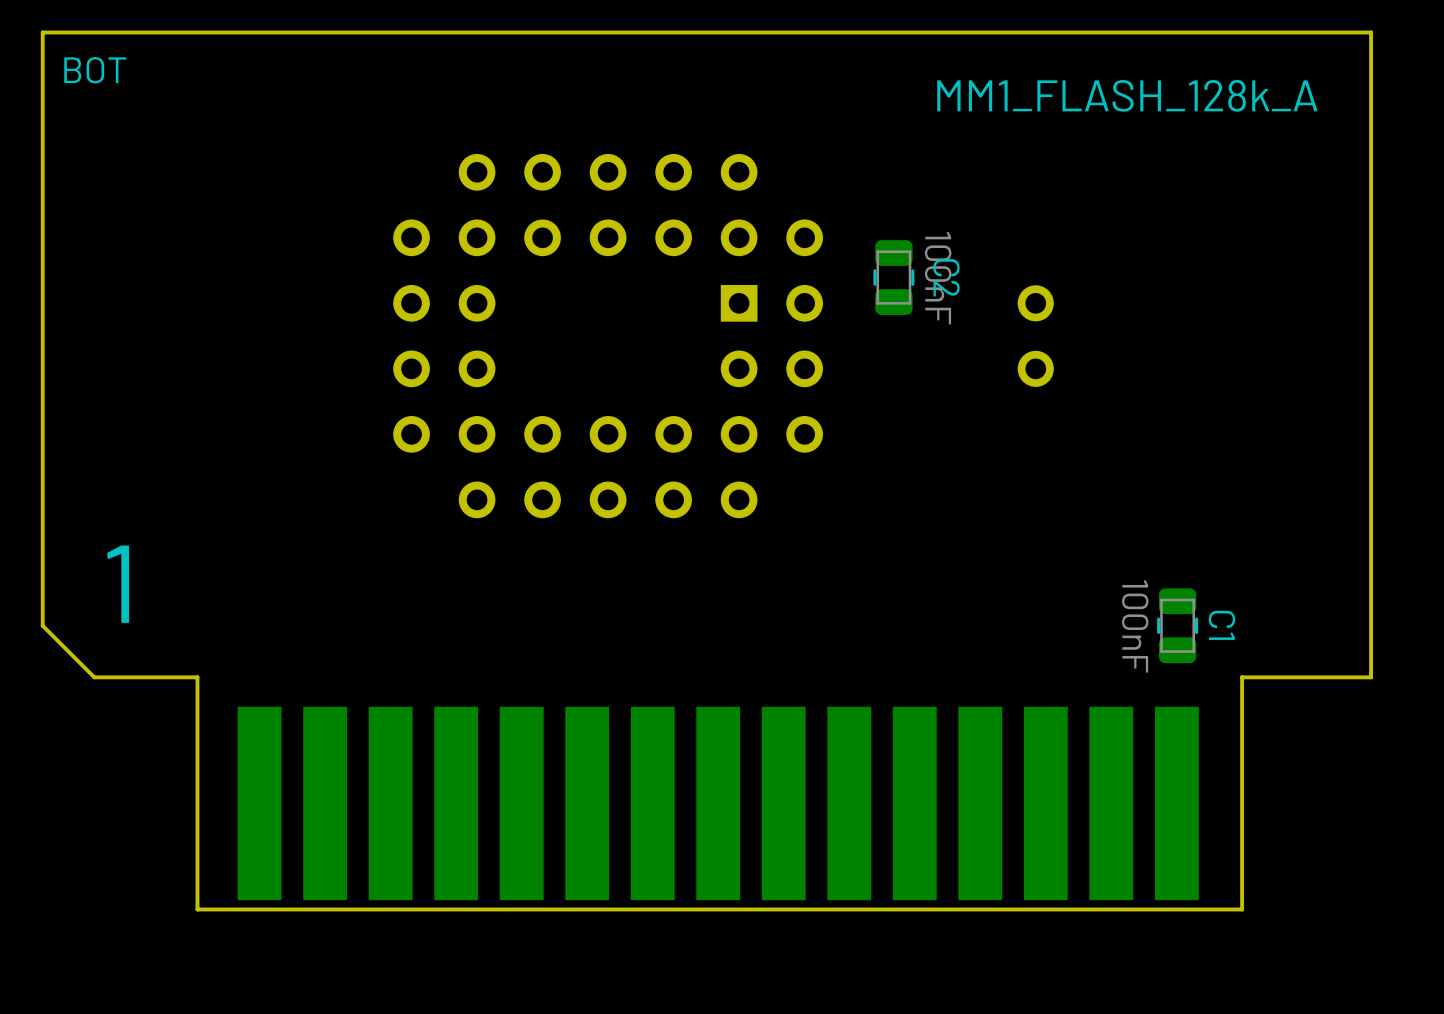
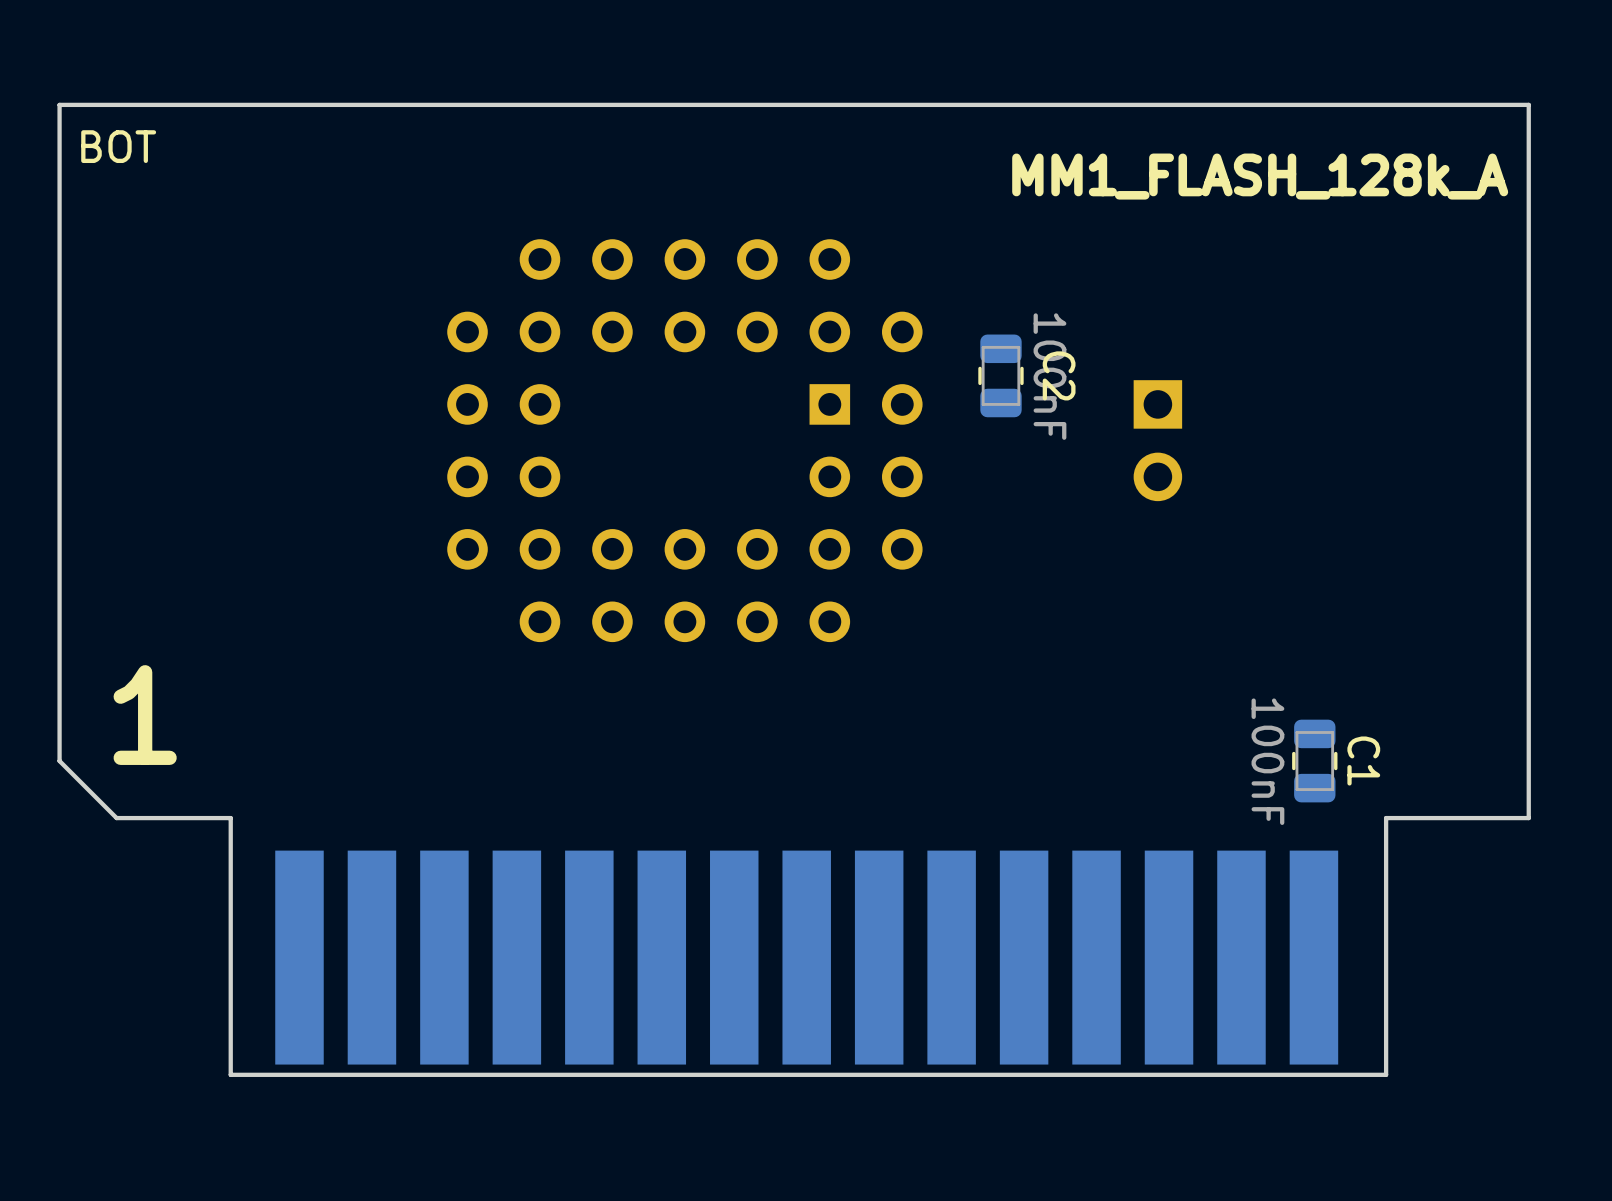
part footprint: [1017, 285, 1054, 387] -> [1133, 380, 1183, 502]

